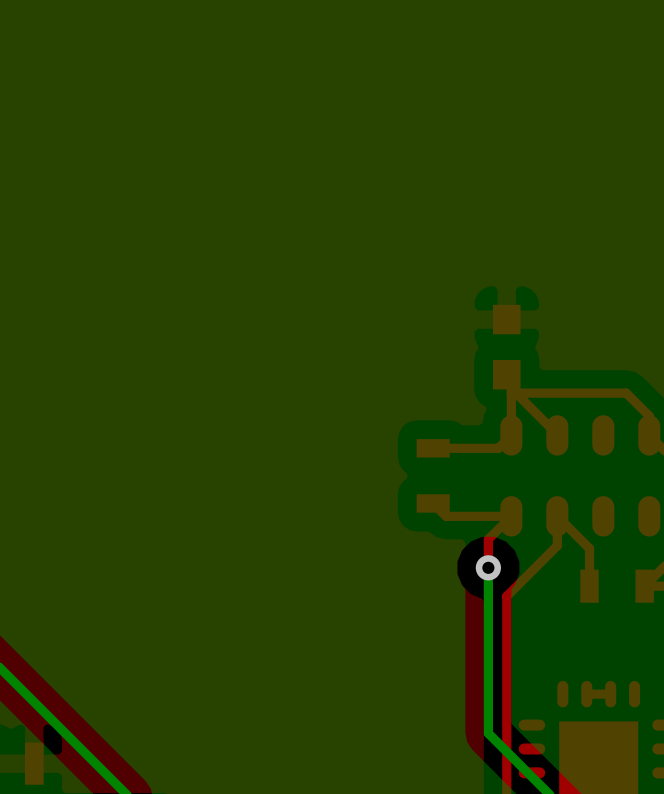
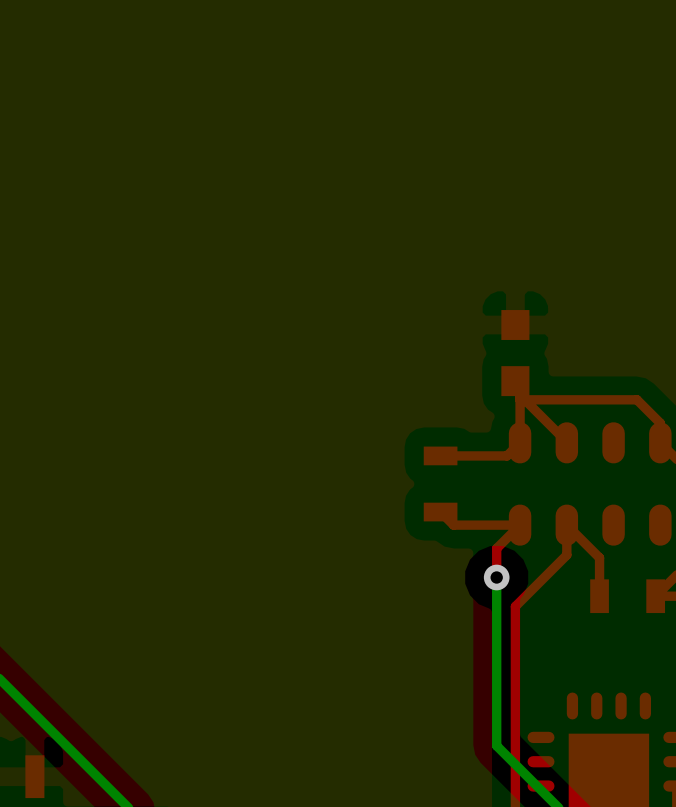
top track: (610, 694) (586, 694) -> none

